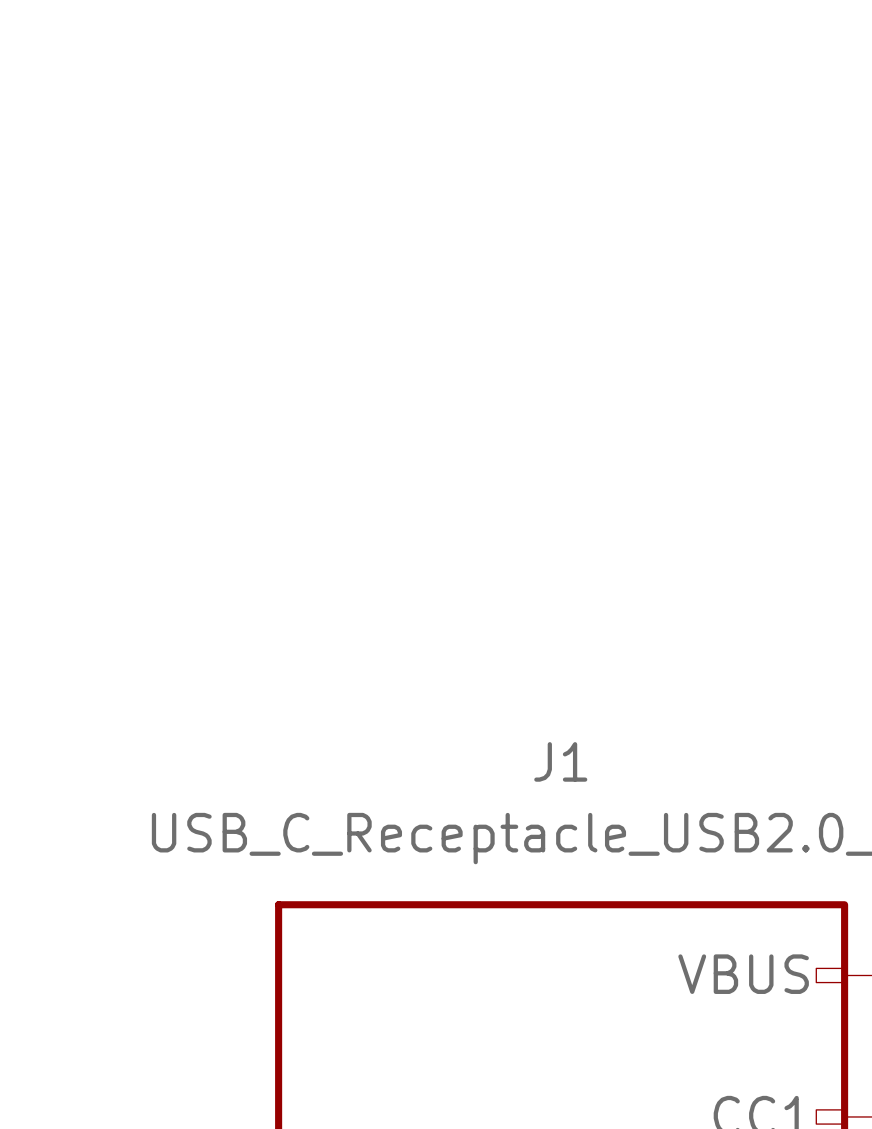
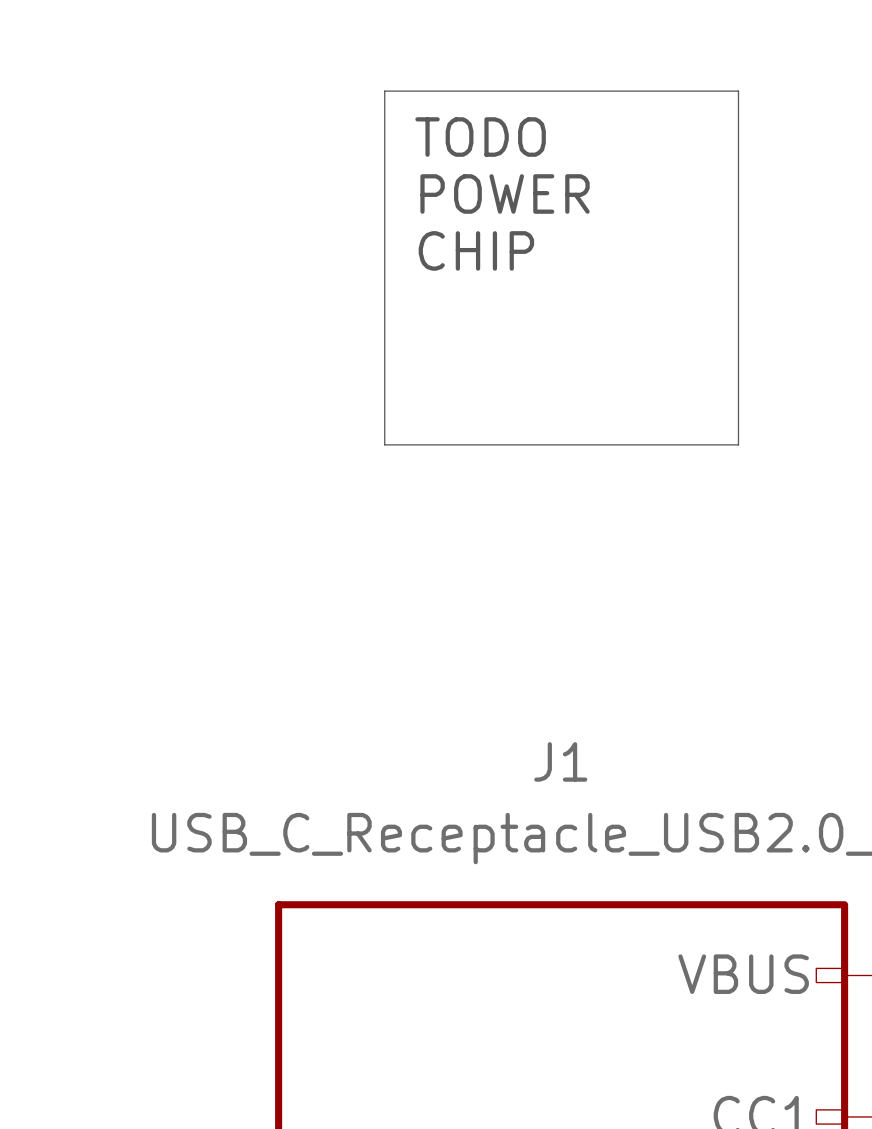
line: none -> (384, 91) (738, 91) (738, 444) (384, 444) (384, 91)
text: none -> TODO (480, 137)
text: none -> POWER (505, 193)
text: none -> CHIP (476, 250)

